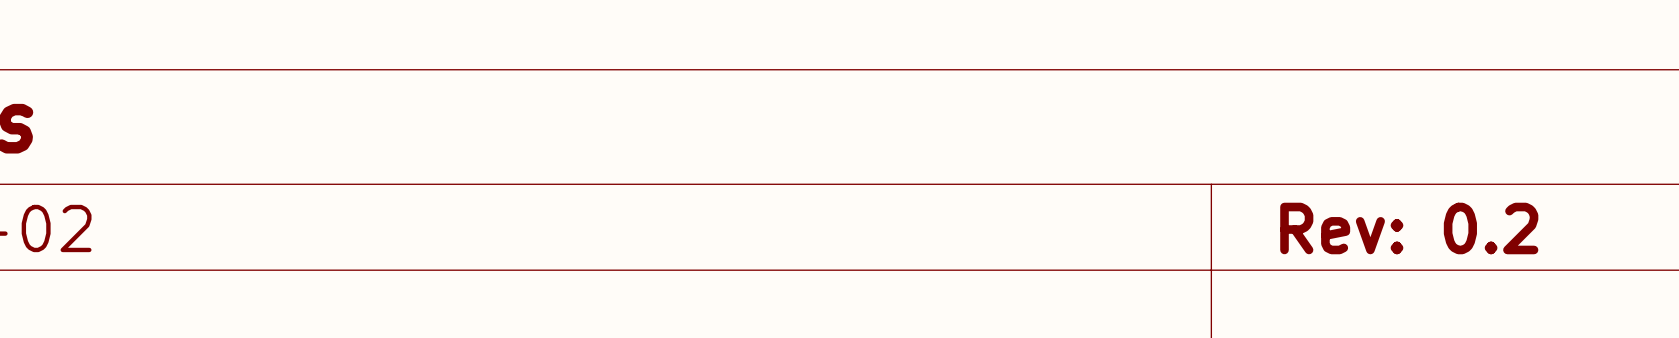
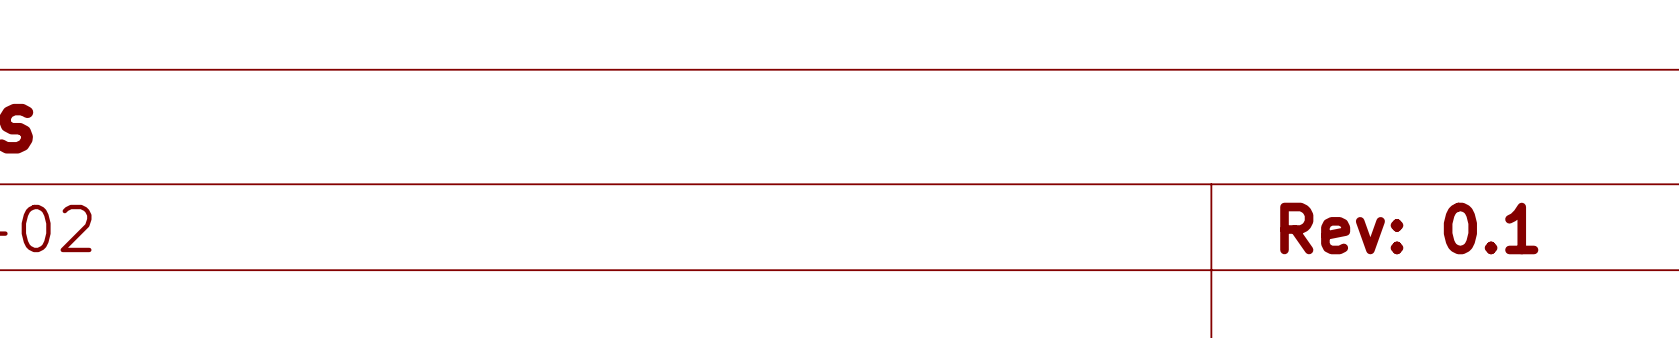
title block: Rev: 0.2 (1409, 228) -> Rev: 0.1 (1409, 228)

